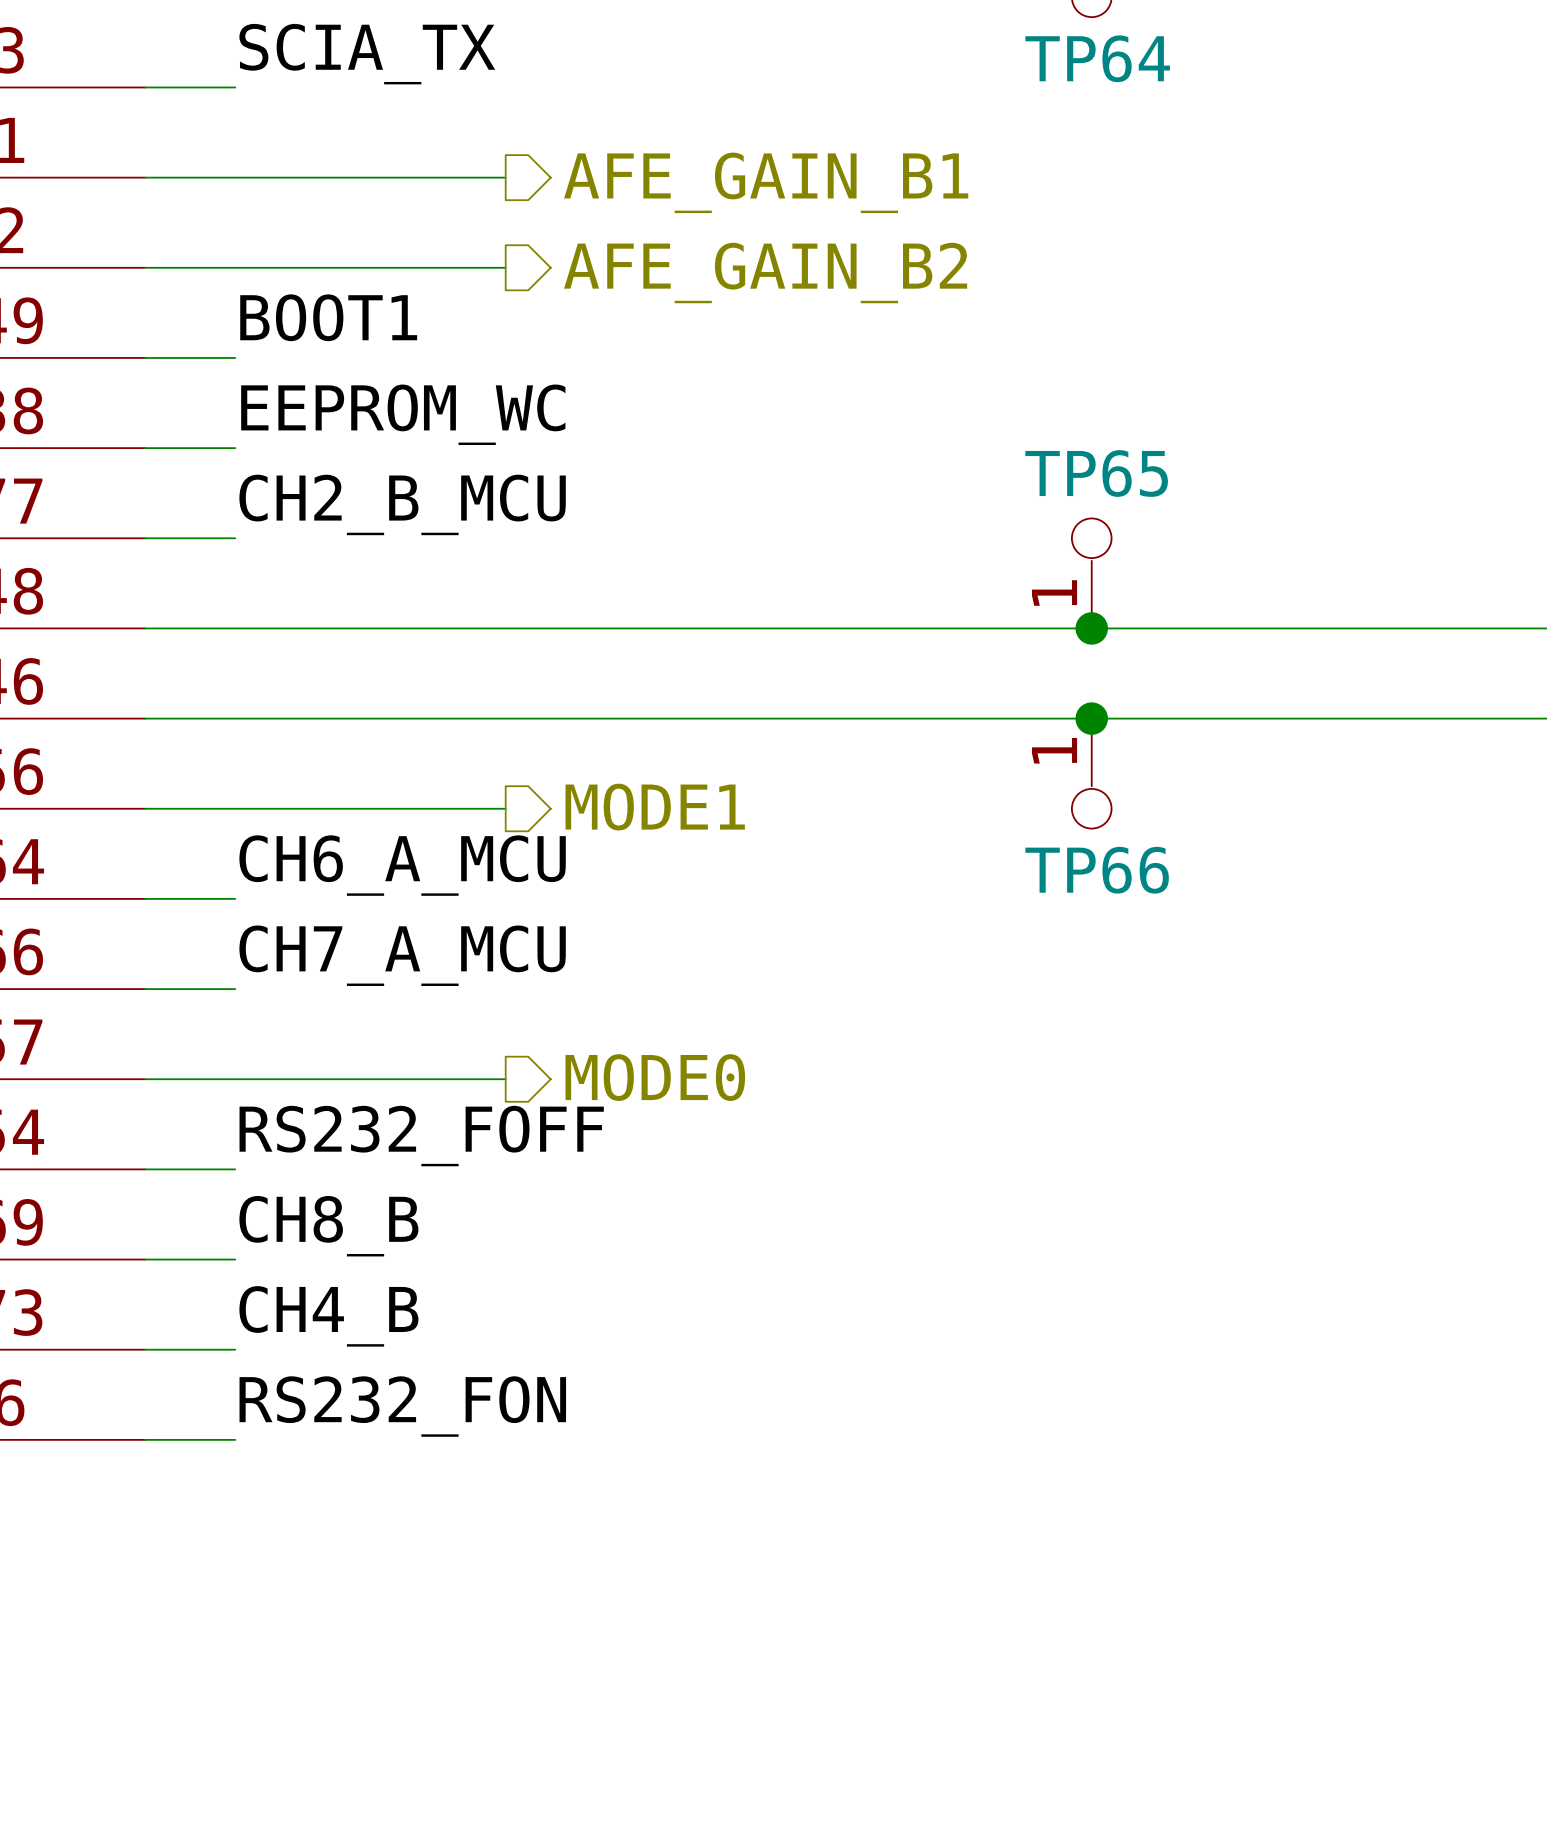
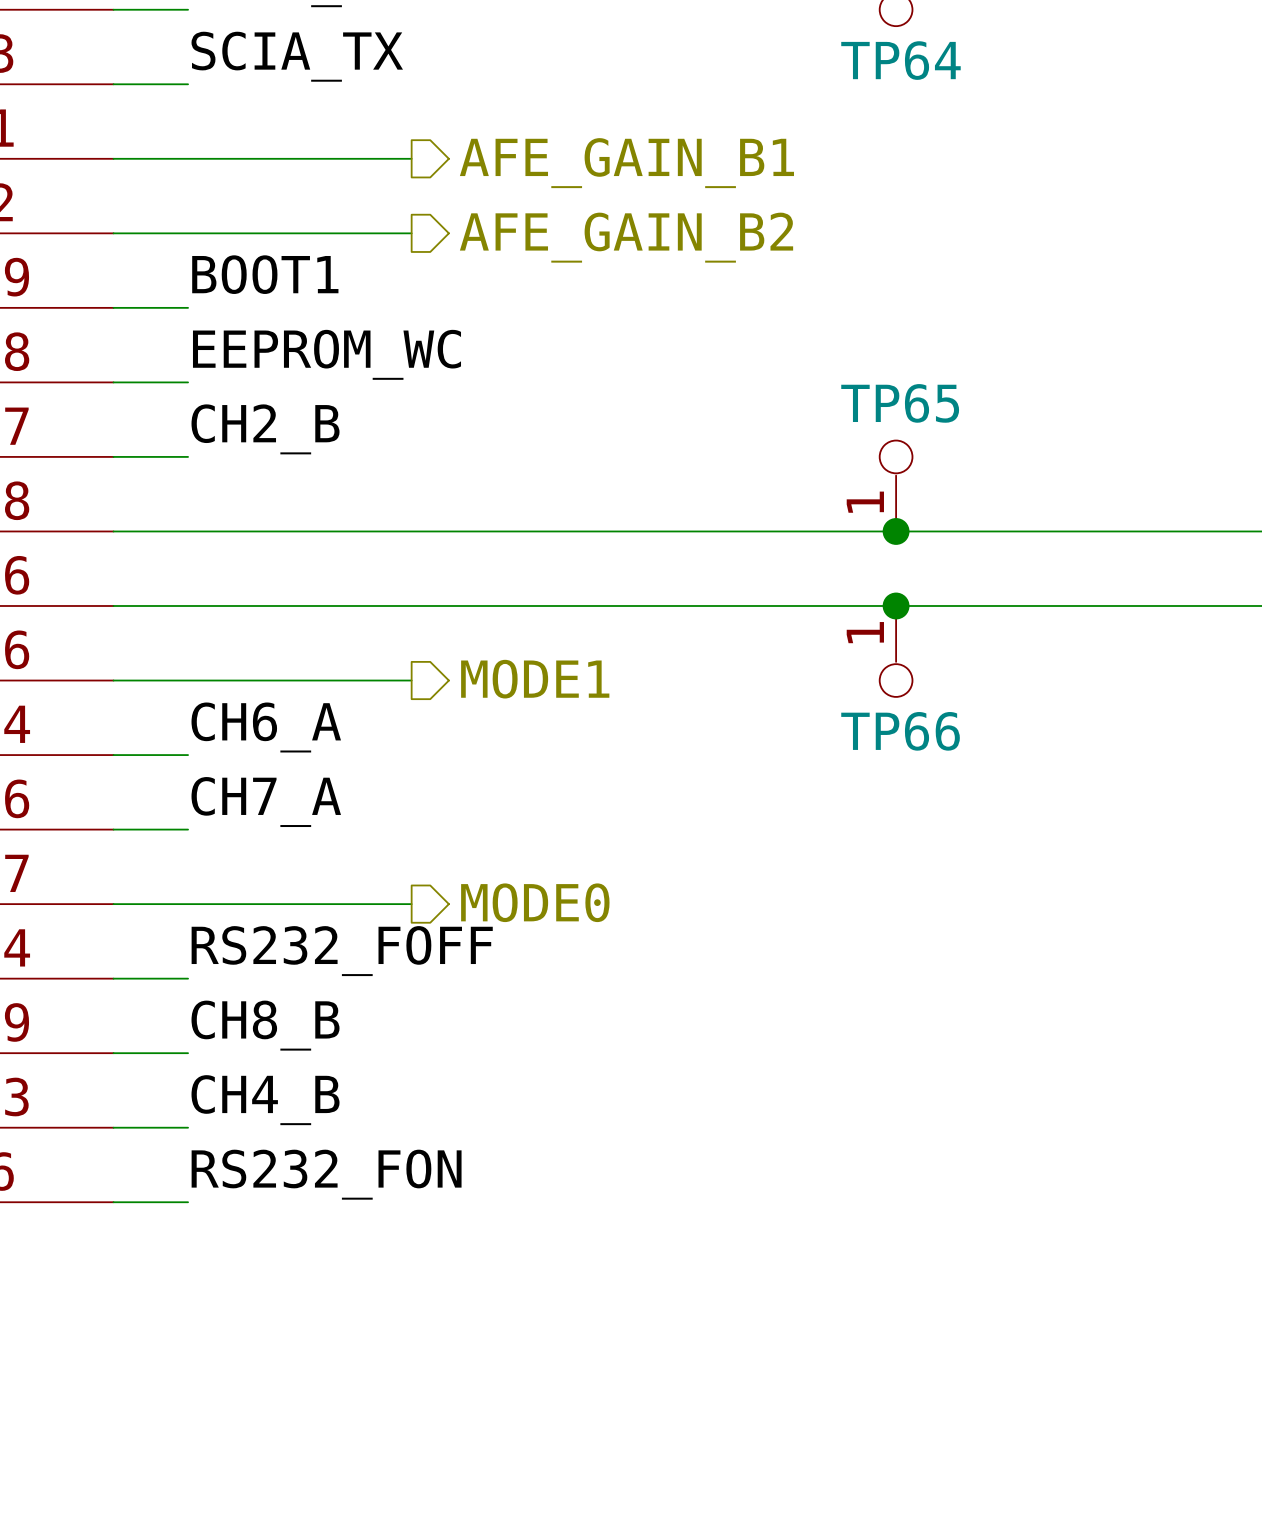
label: CH2_B_MCU (402, 504) -> CH2_B (265, 429)
label: CH6_A_MCU (402, 865) -> CH6_A (266, 727)
label: CH7_A_MCU (402, 955) -> CH7_A (266, 802)

